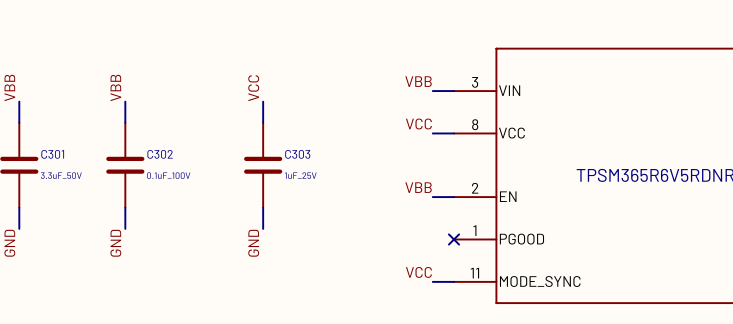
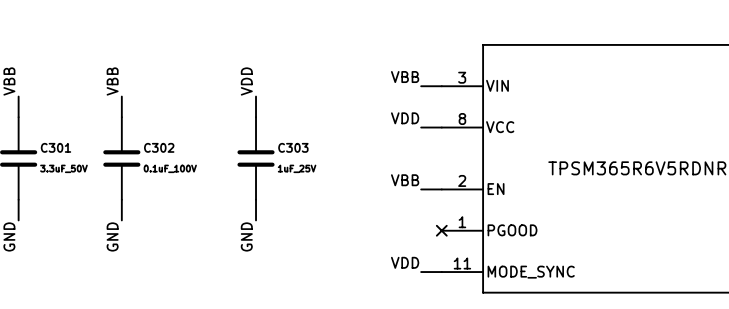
label: VCC (253, 88) -> VDD (246, 81)
label: VCC (418, 124) -> VDD (405, 118)
label: VCC (418, 272) -> VDD (405, 262)

